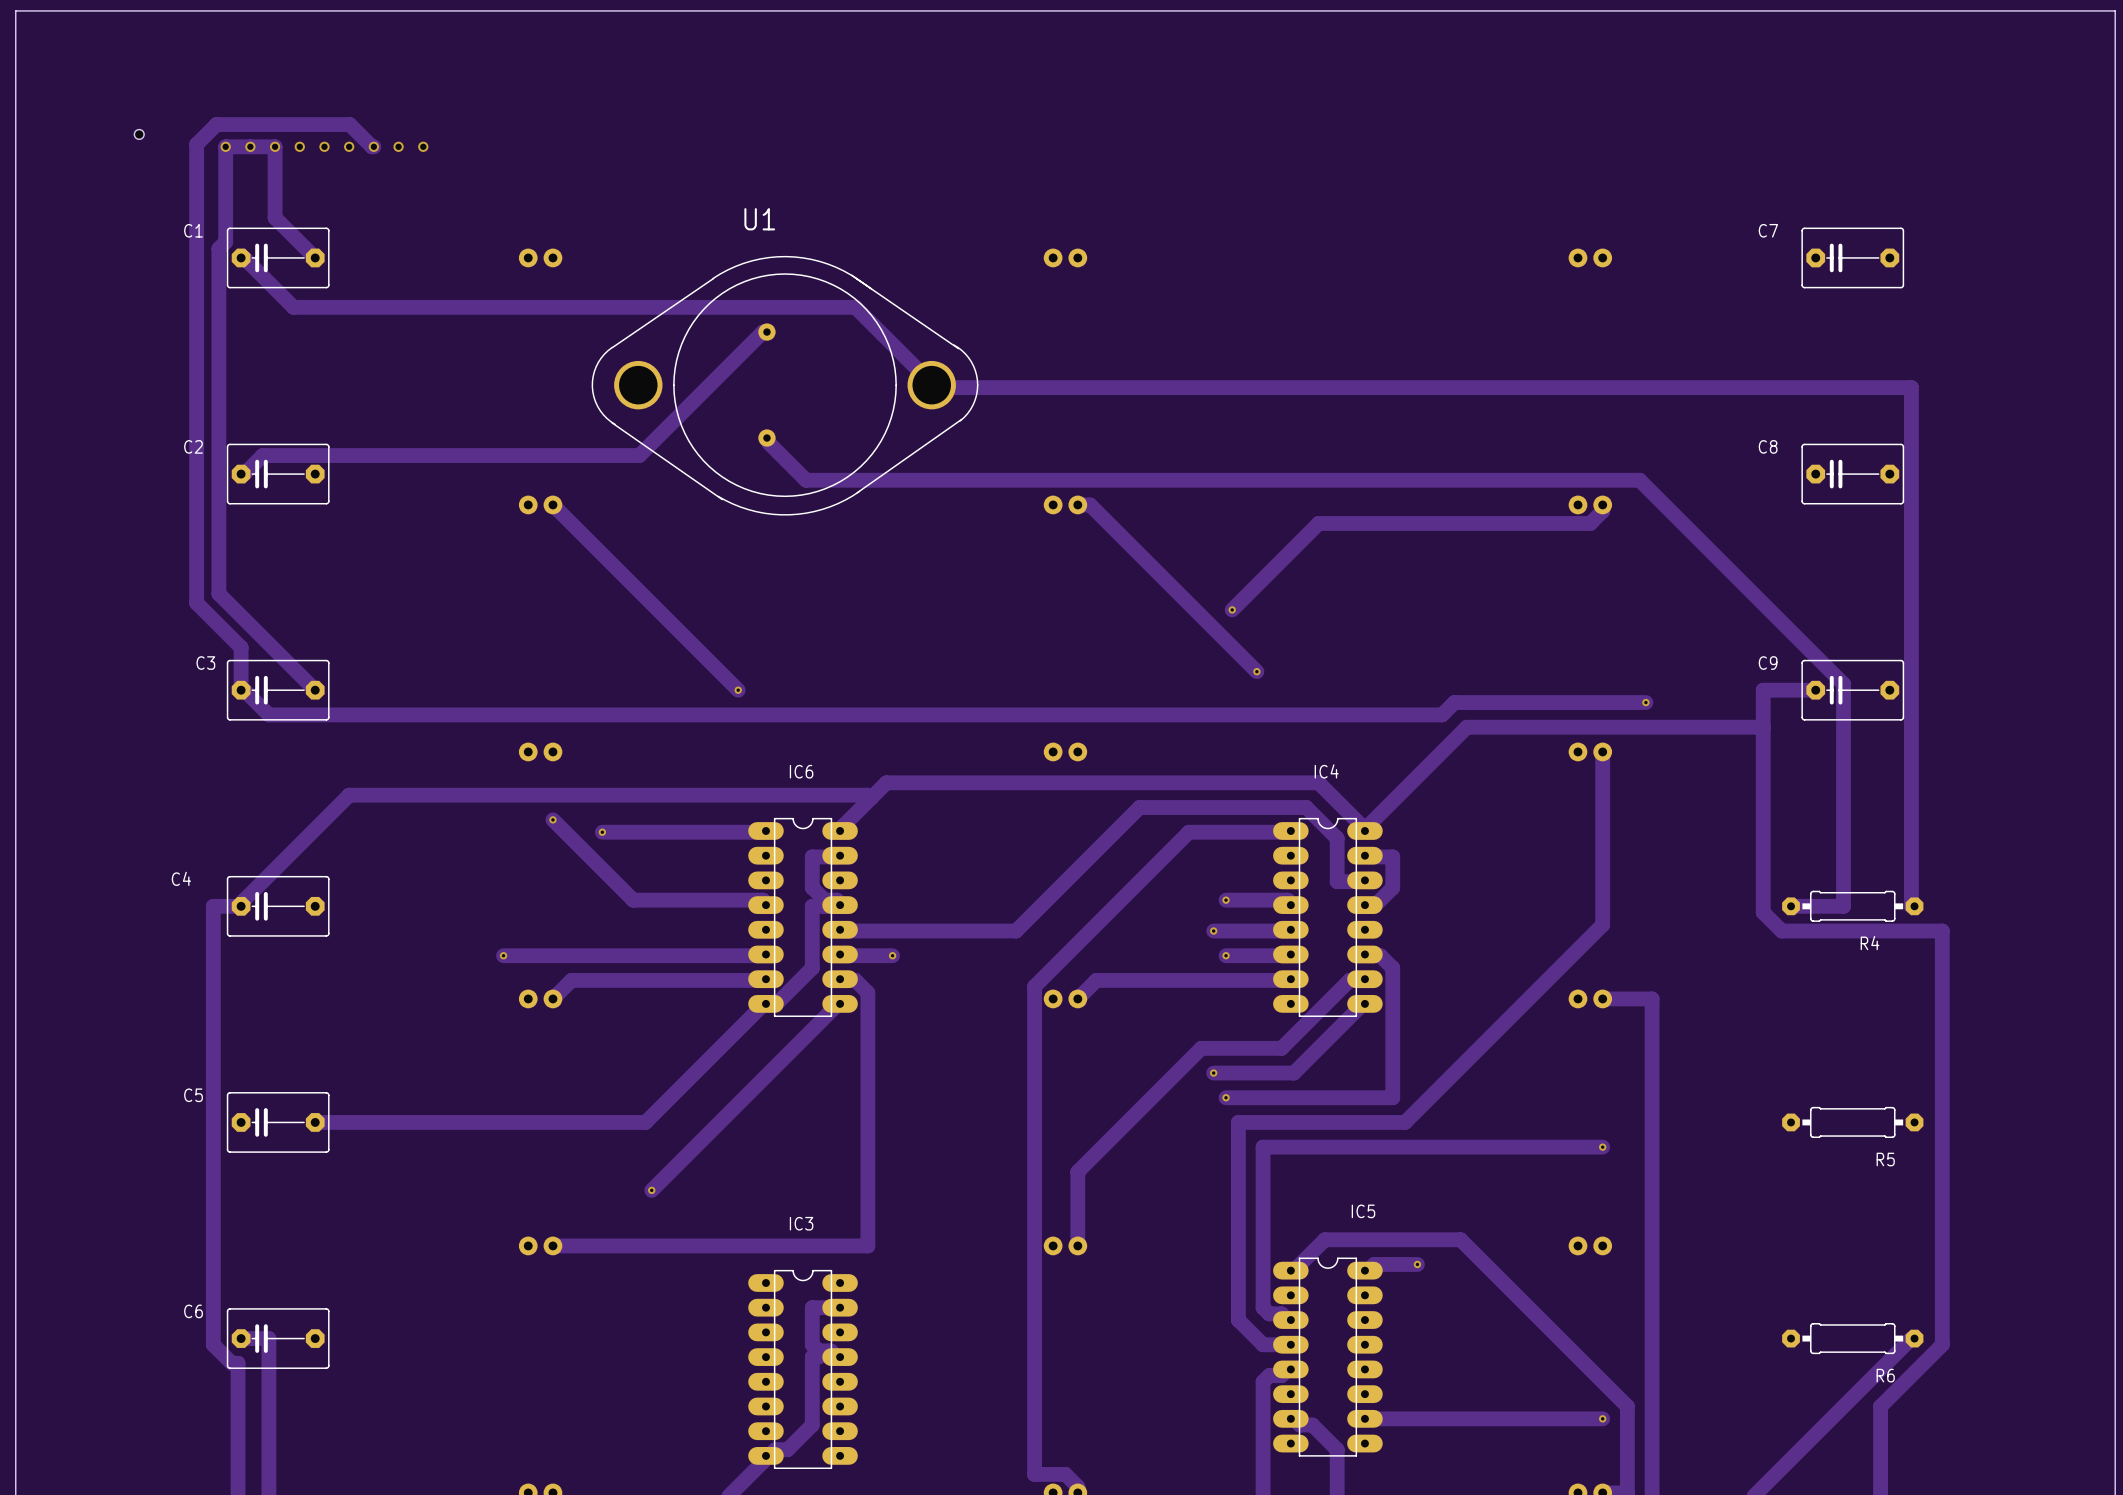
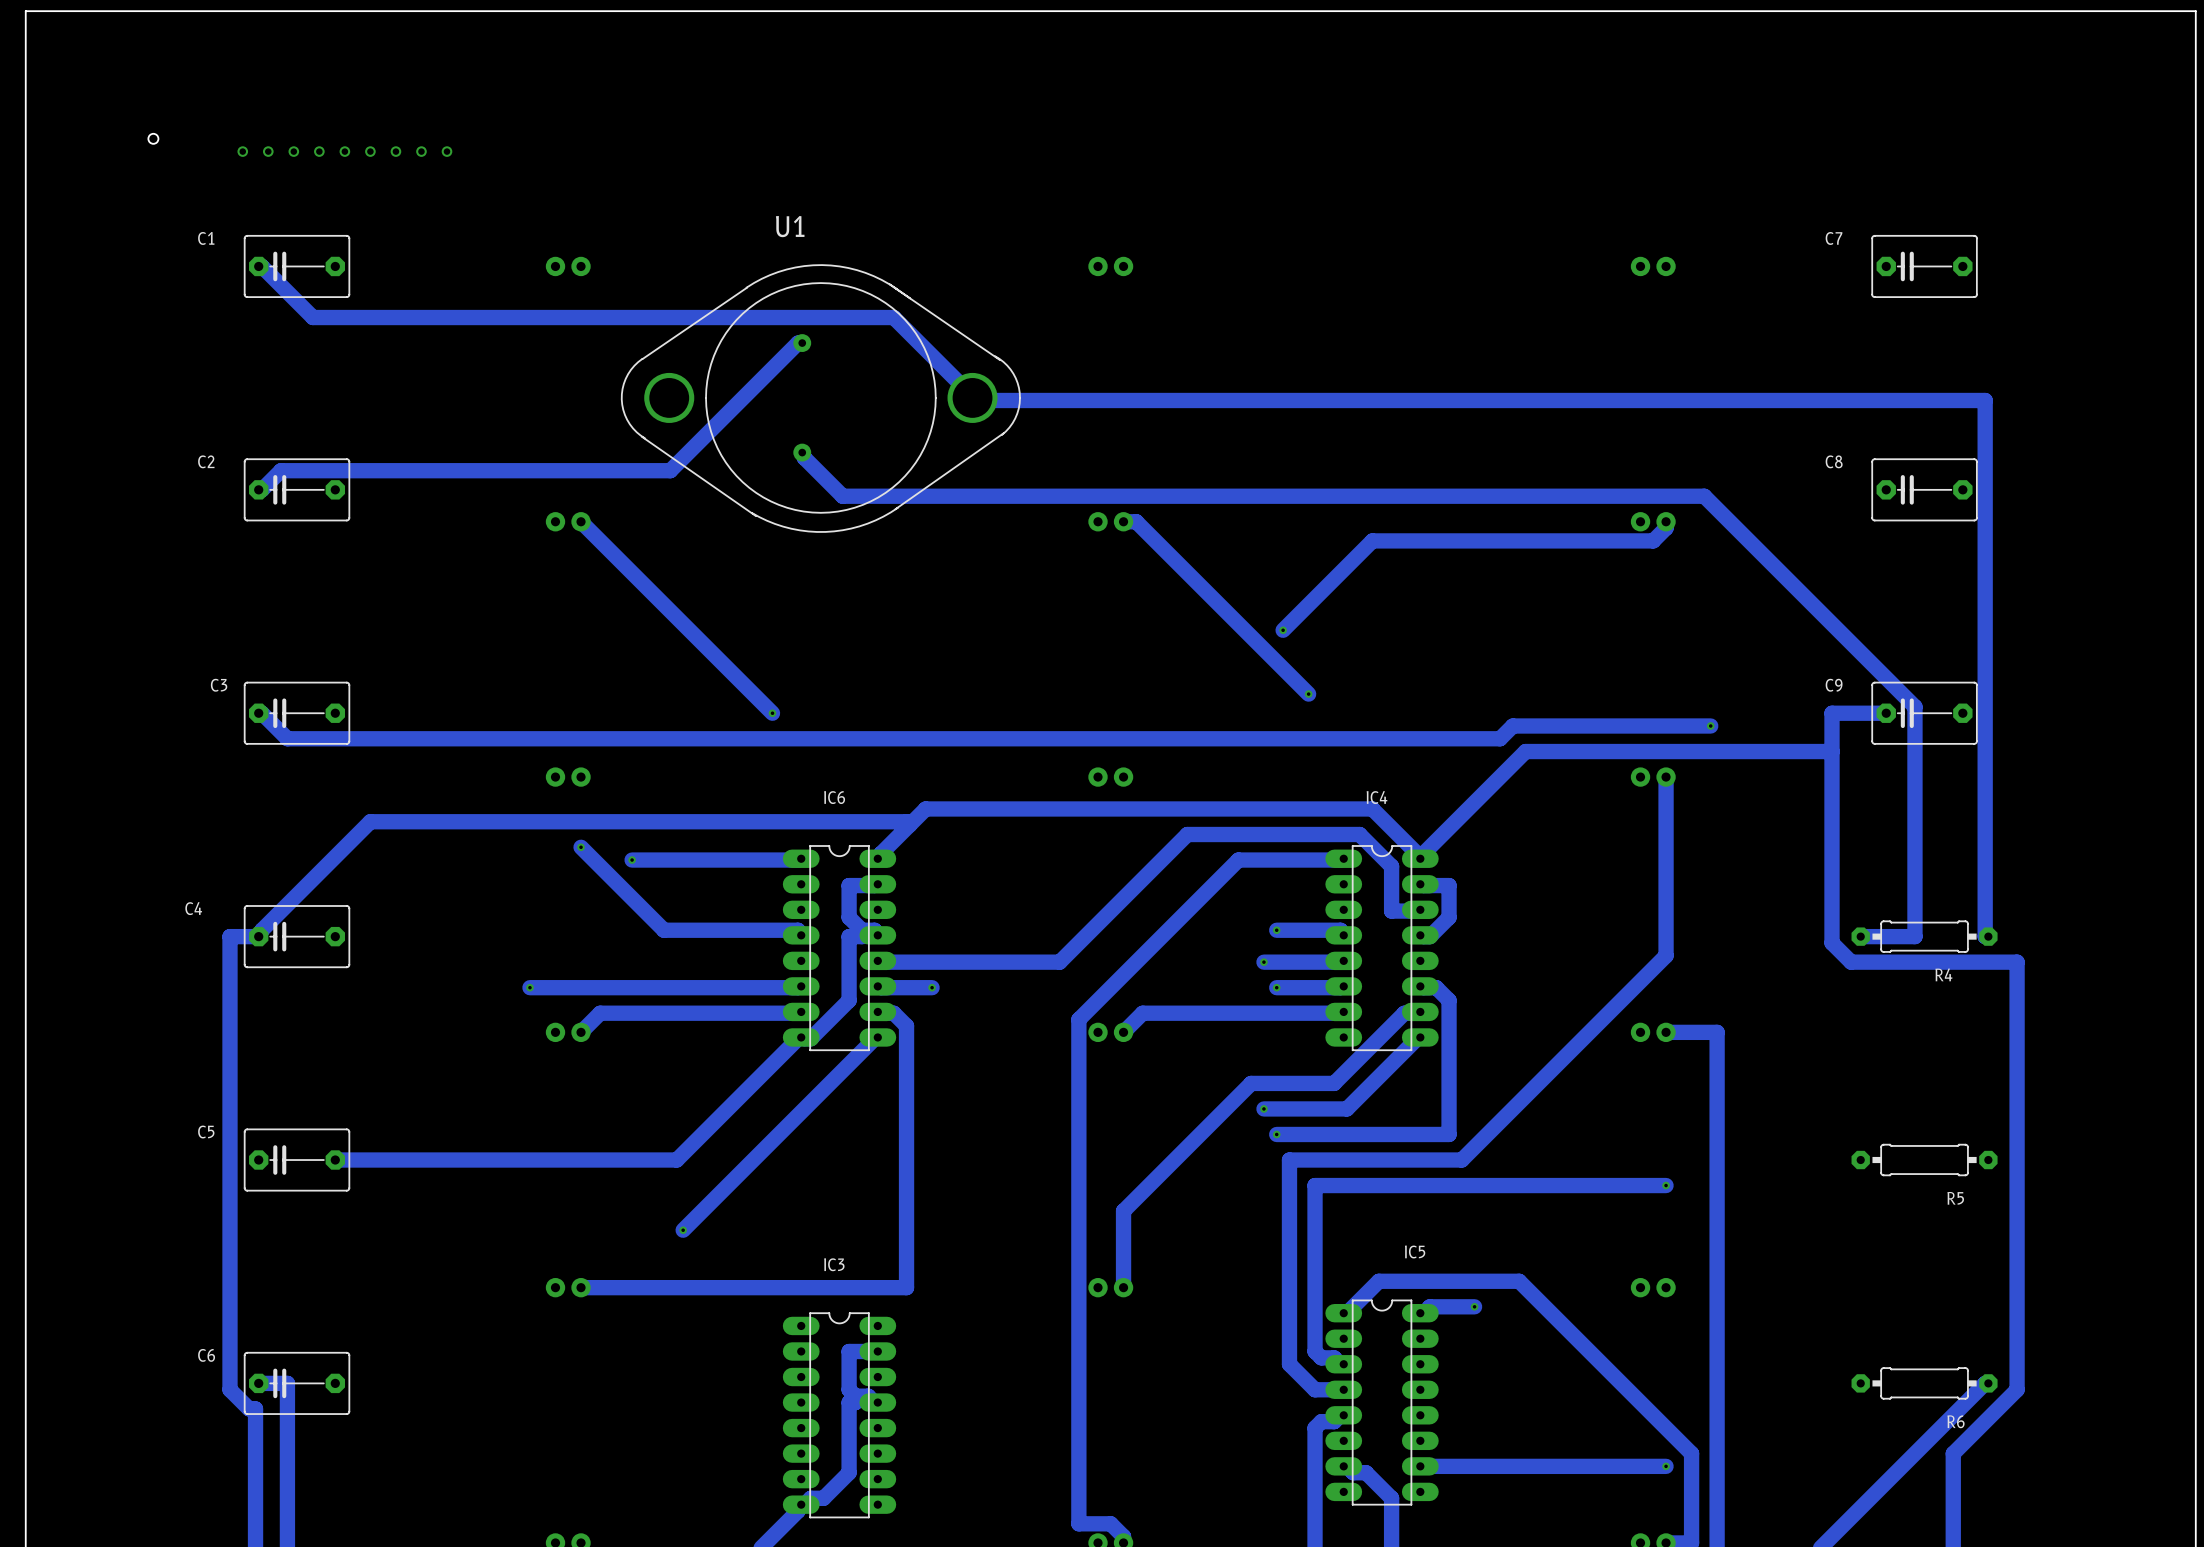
track: (373, 146) (349, 124) (216, 124) (196, 144) (196, 603) (241, 647) (241, 690) -> none
track: (315, 257) (275, 217) (275, 146) (225, 146) (225, 241) (218, 248) (218, 593) (315, 690) -> none

